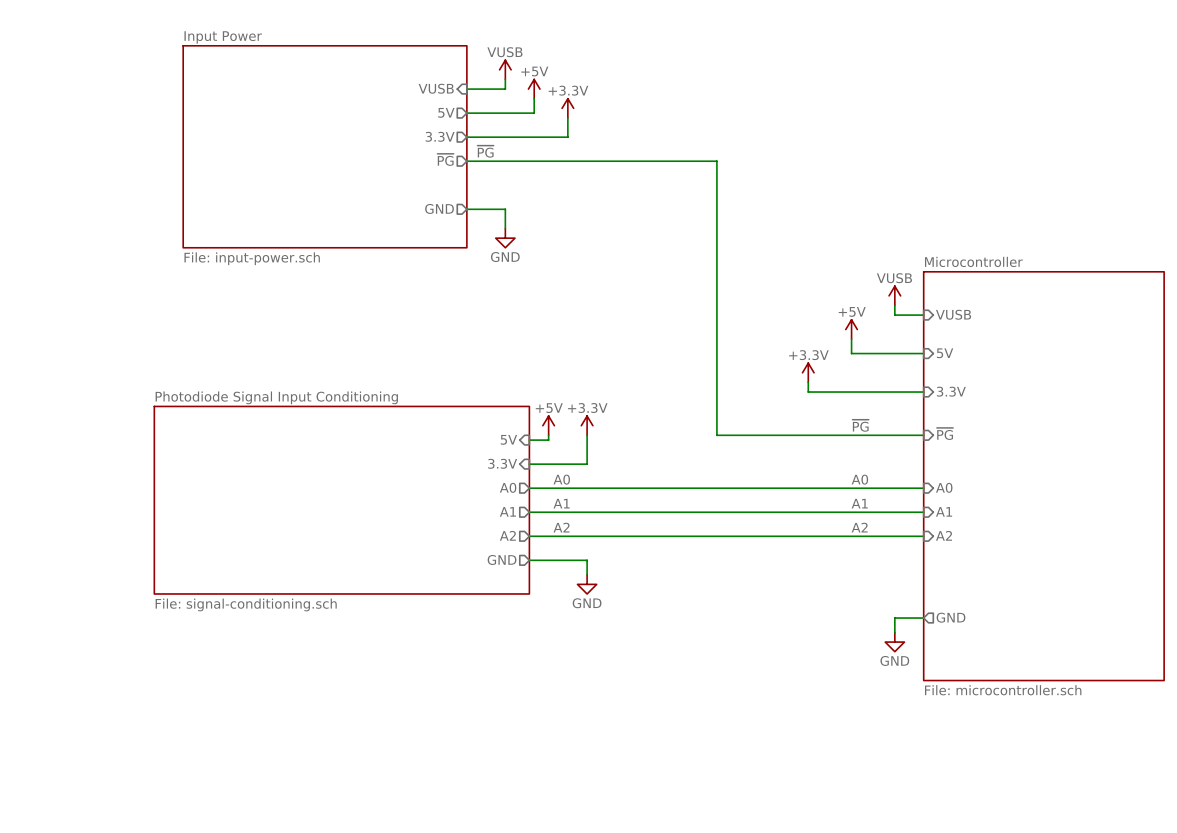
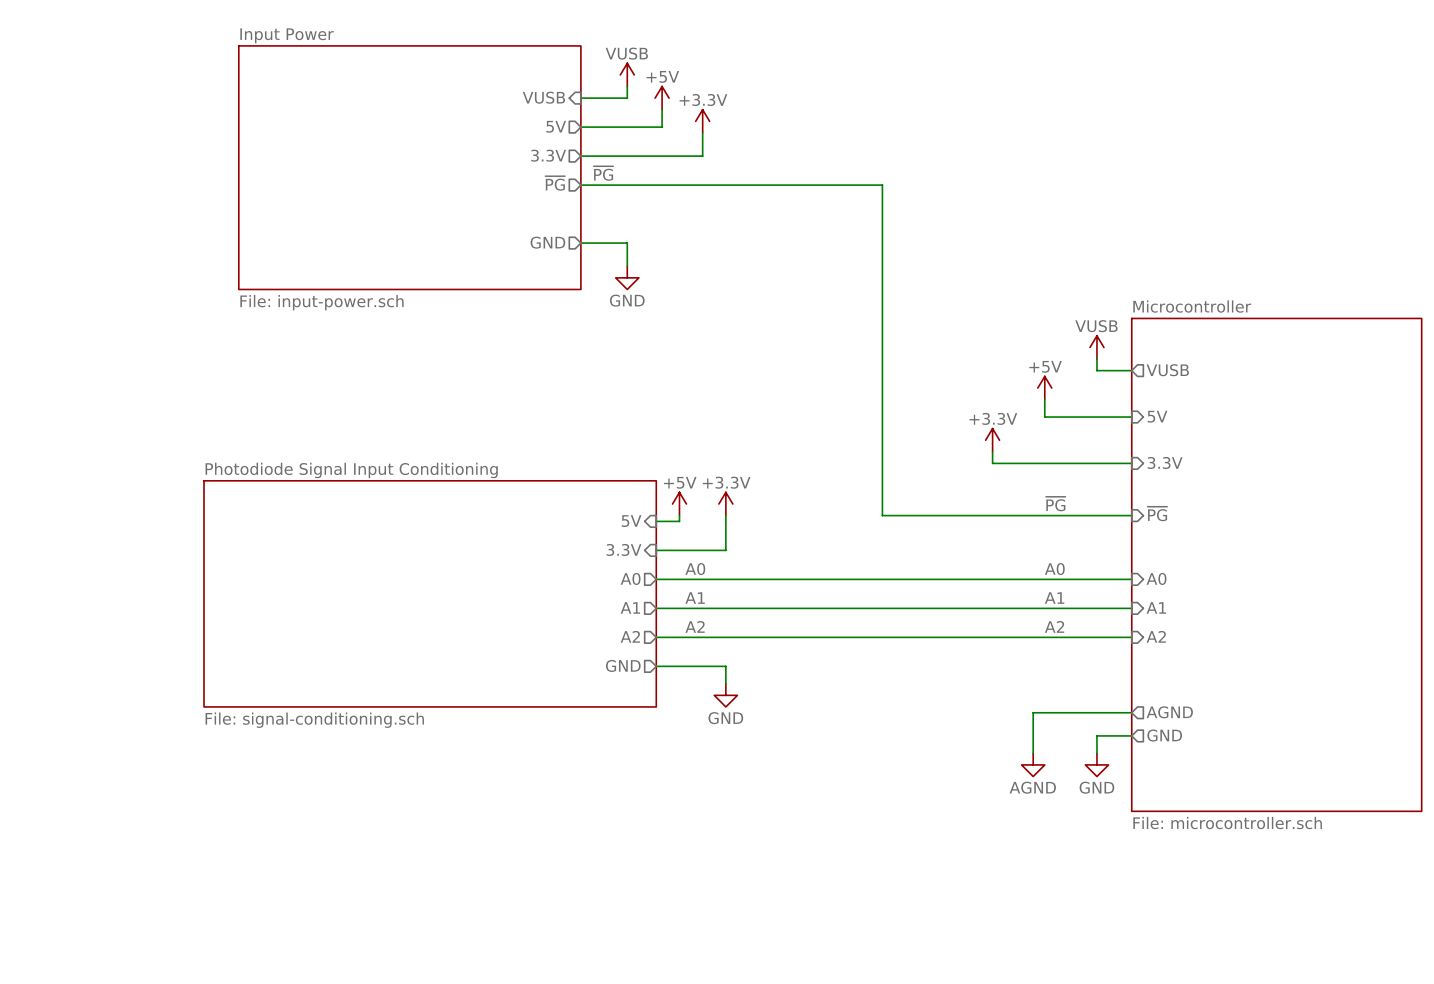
sheet pin shape: input (953, 314) -> output (1167, 370)
wire: none -> (1131, 712) (1033, 712) (1033, 753)
sheet pin: none -> AGND (1169, 712)
power symbol: none -> AGND (1033, 764)

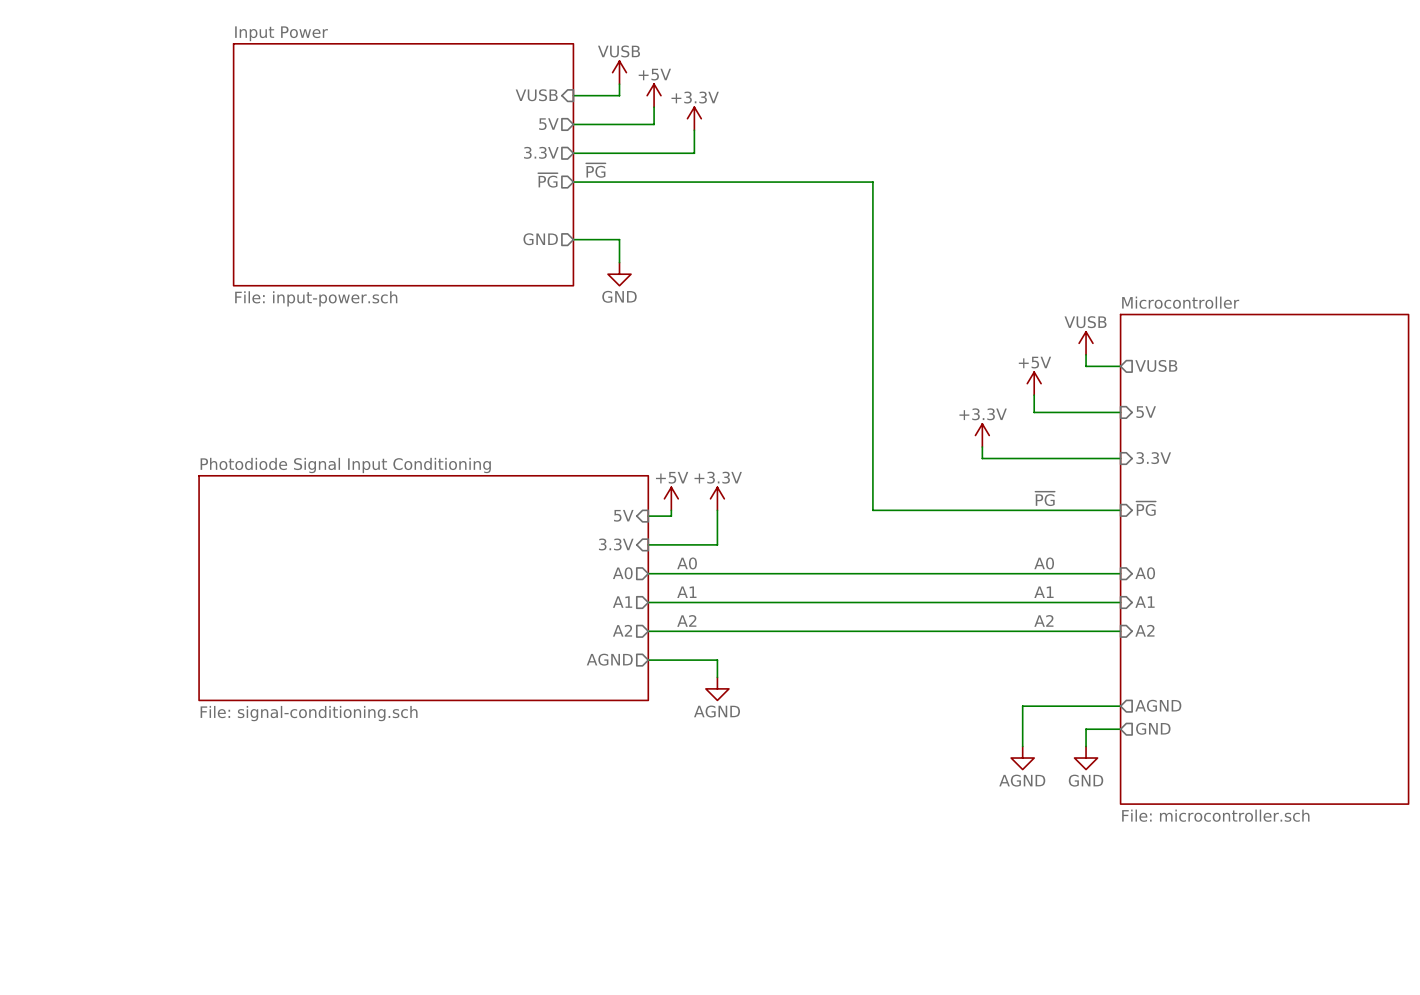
sheet pin: GND (623, 665) -> AGND (609, 659)
power symbol: GND (725, 695) -> AGND (717, 688)

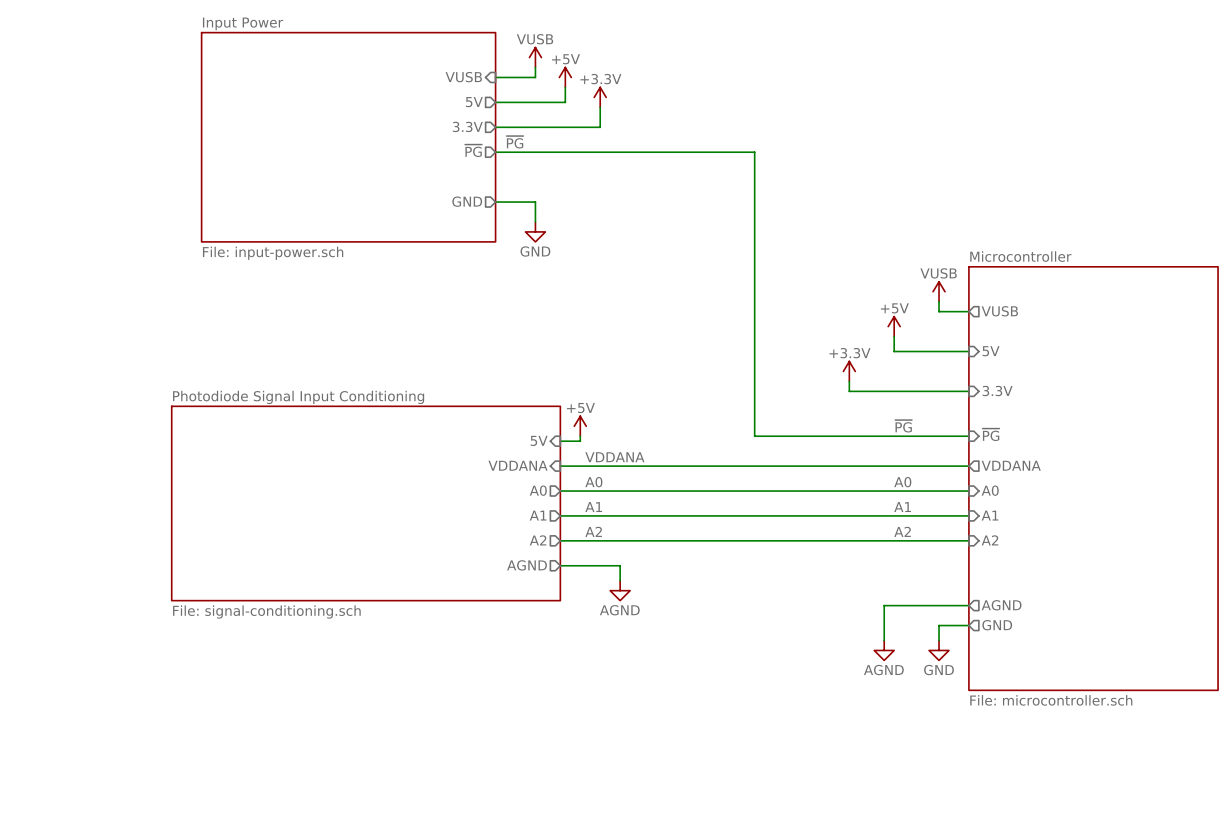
power symbol: +3.3V (717, 498) -> none
wire: (717, 510) (717, 544) -> (968, 466) (620, 466)
label: none -> VDDANA (614, 457)
sheet pin: 3.3V (616, 544) -> VDDANA (518, 465)
sheet pin: none -> VDDANA (1011, 465)

